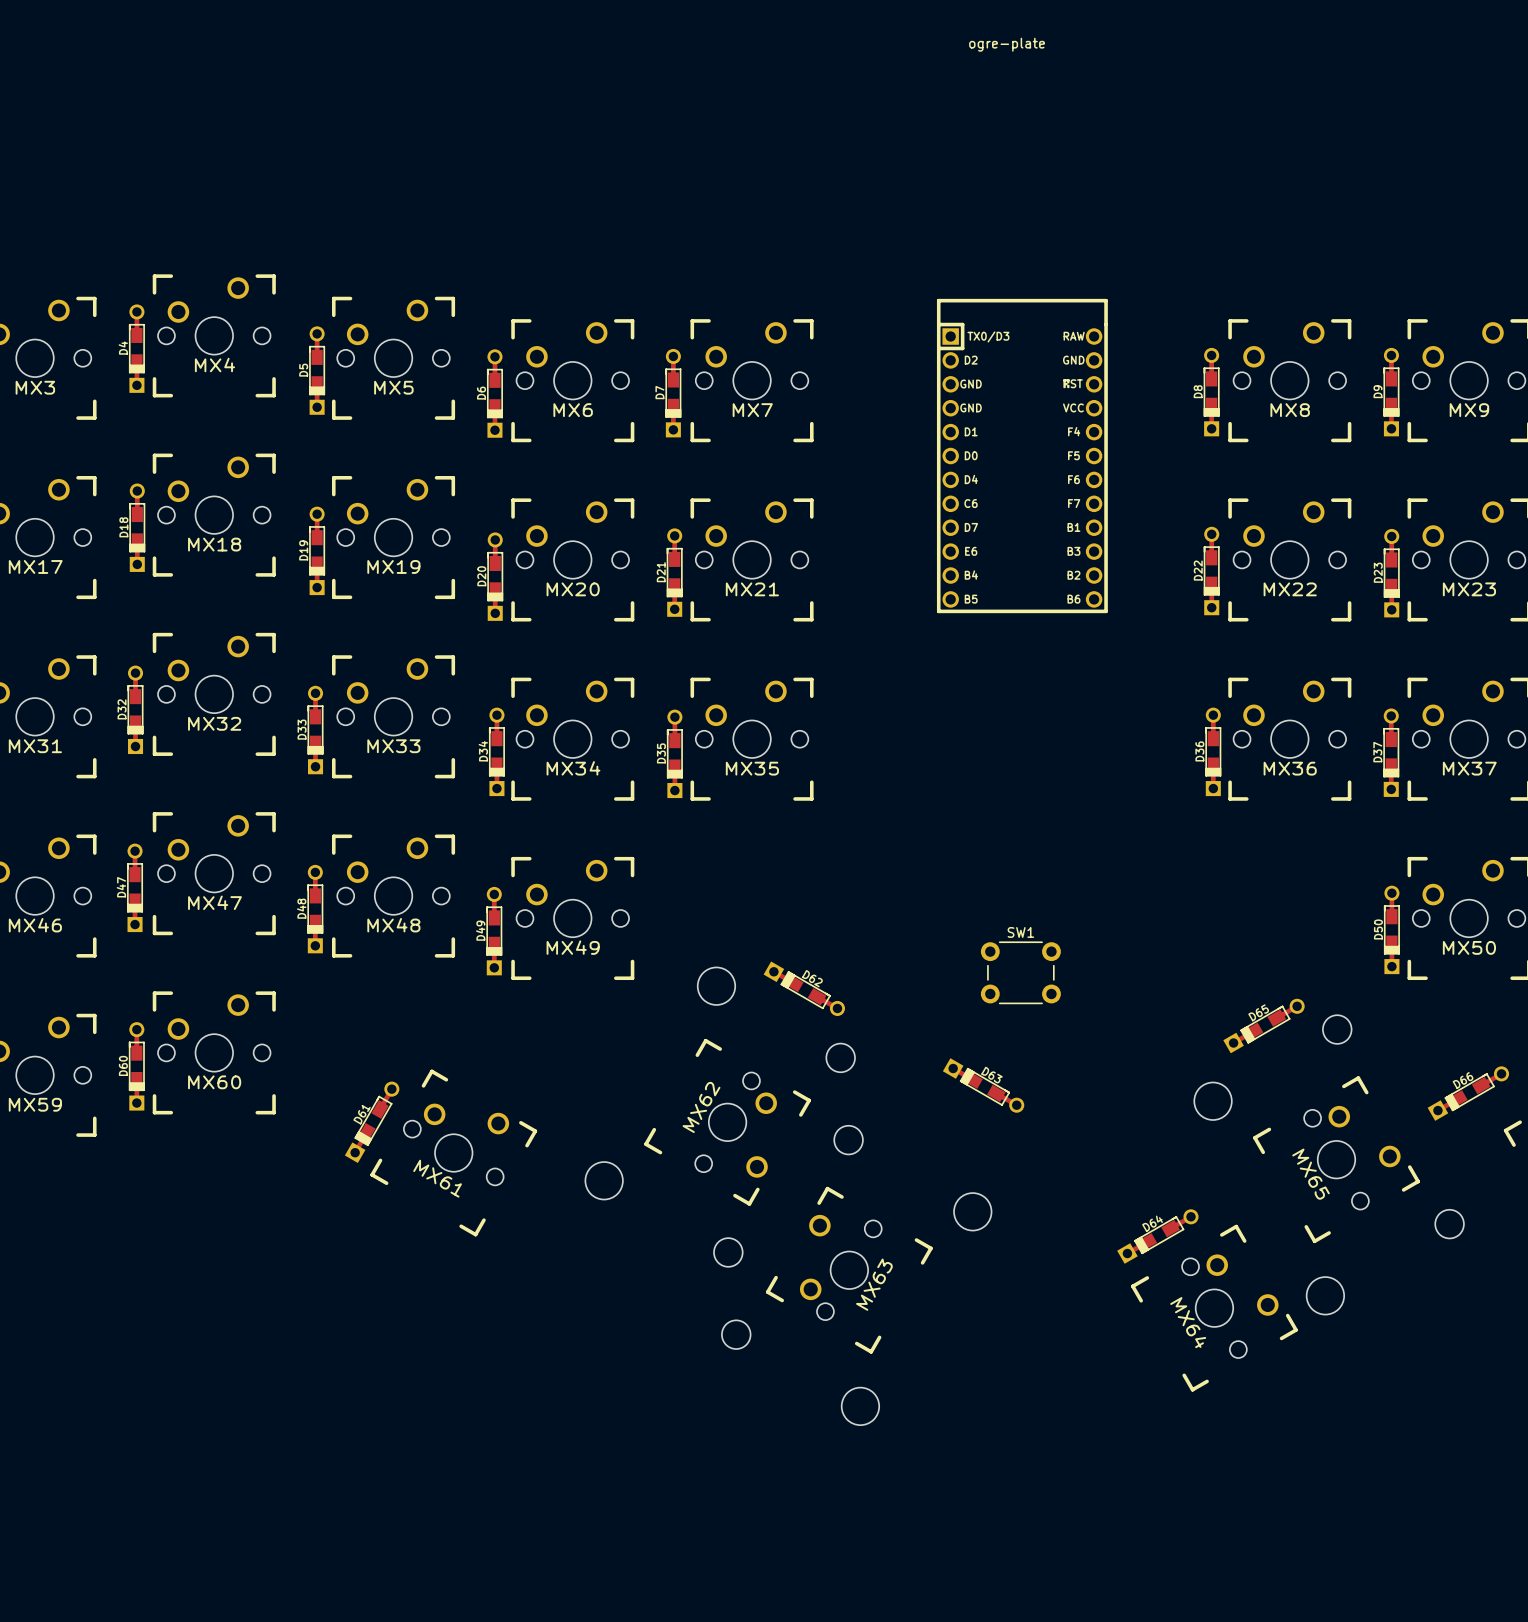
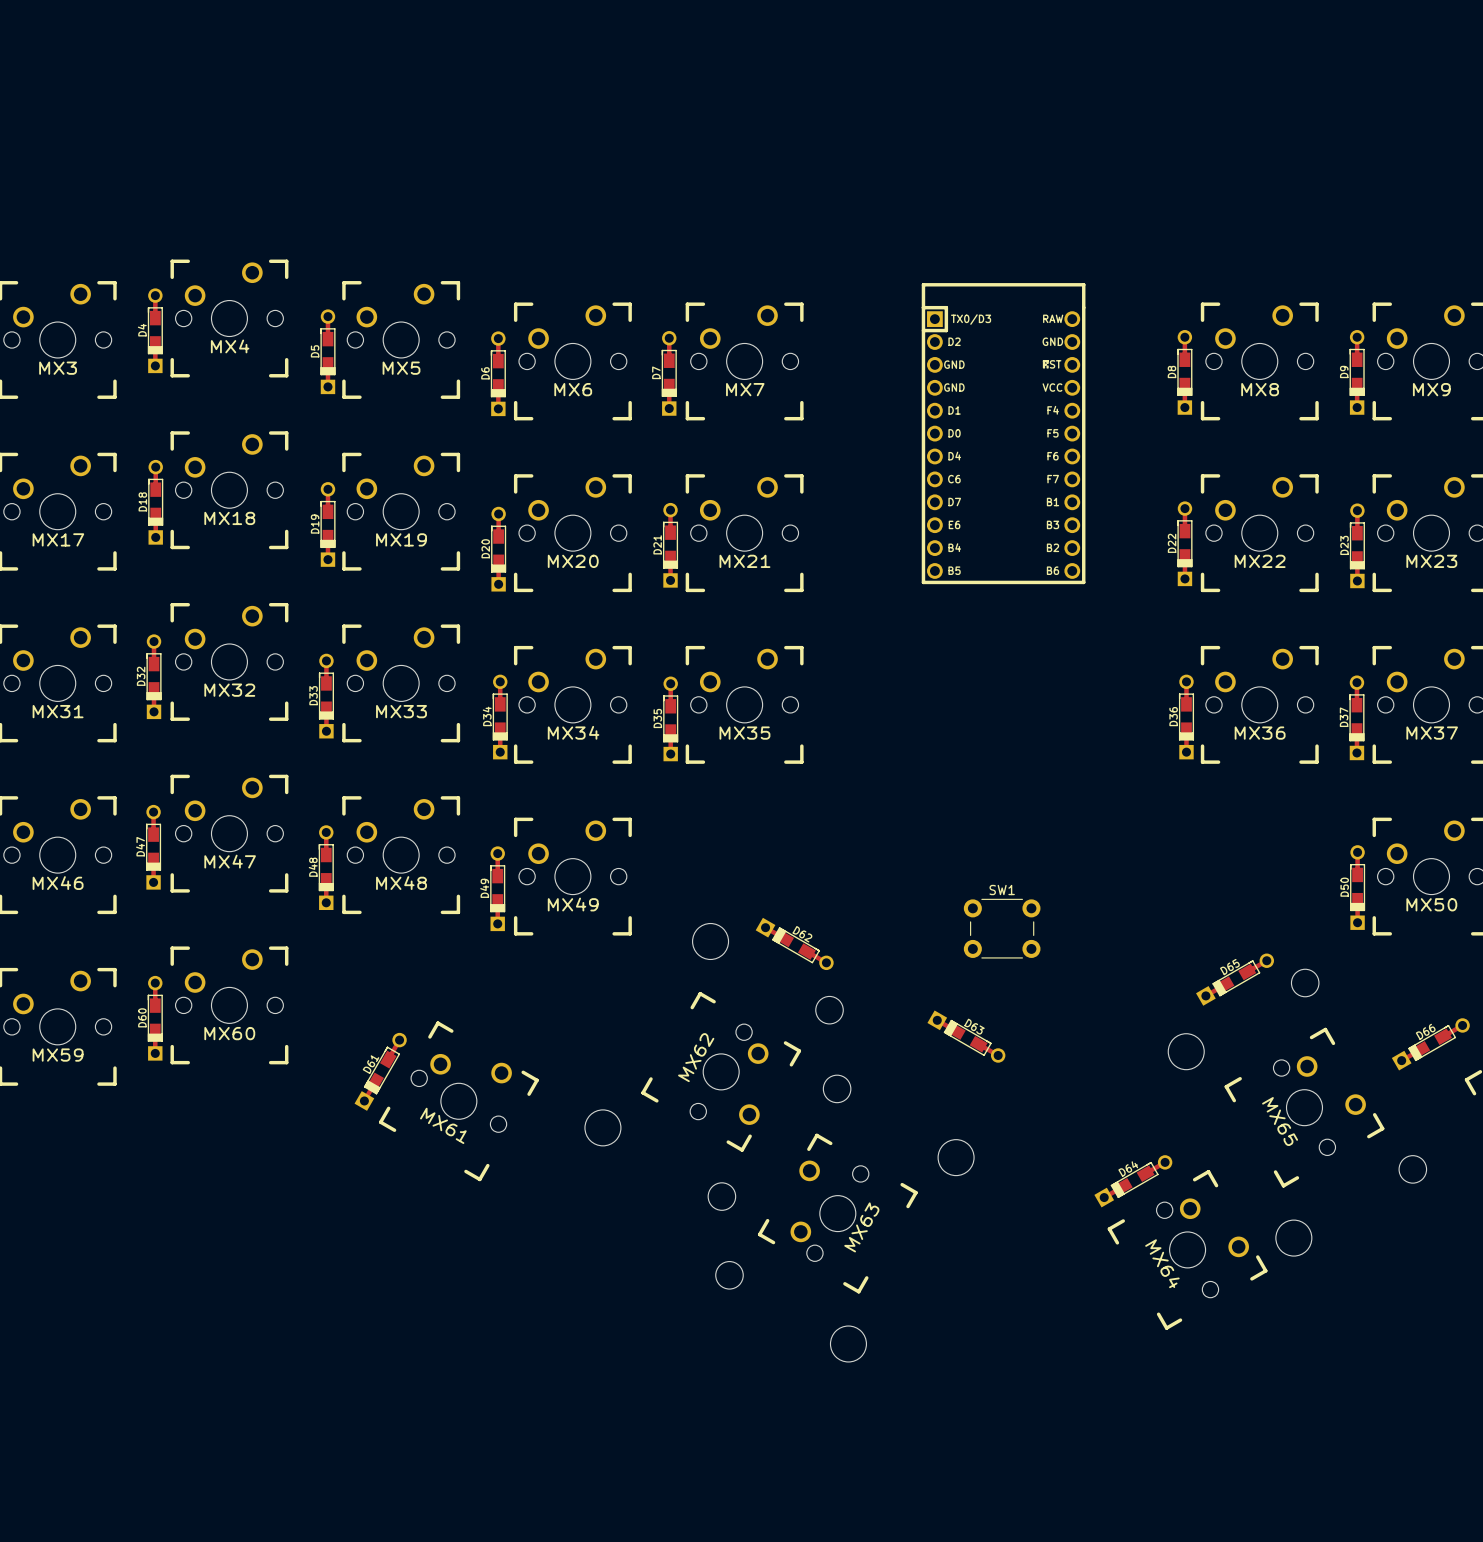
ogre-plate: (1007, 44) -> none

